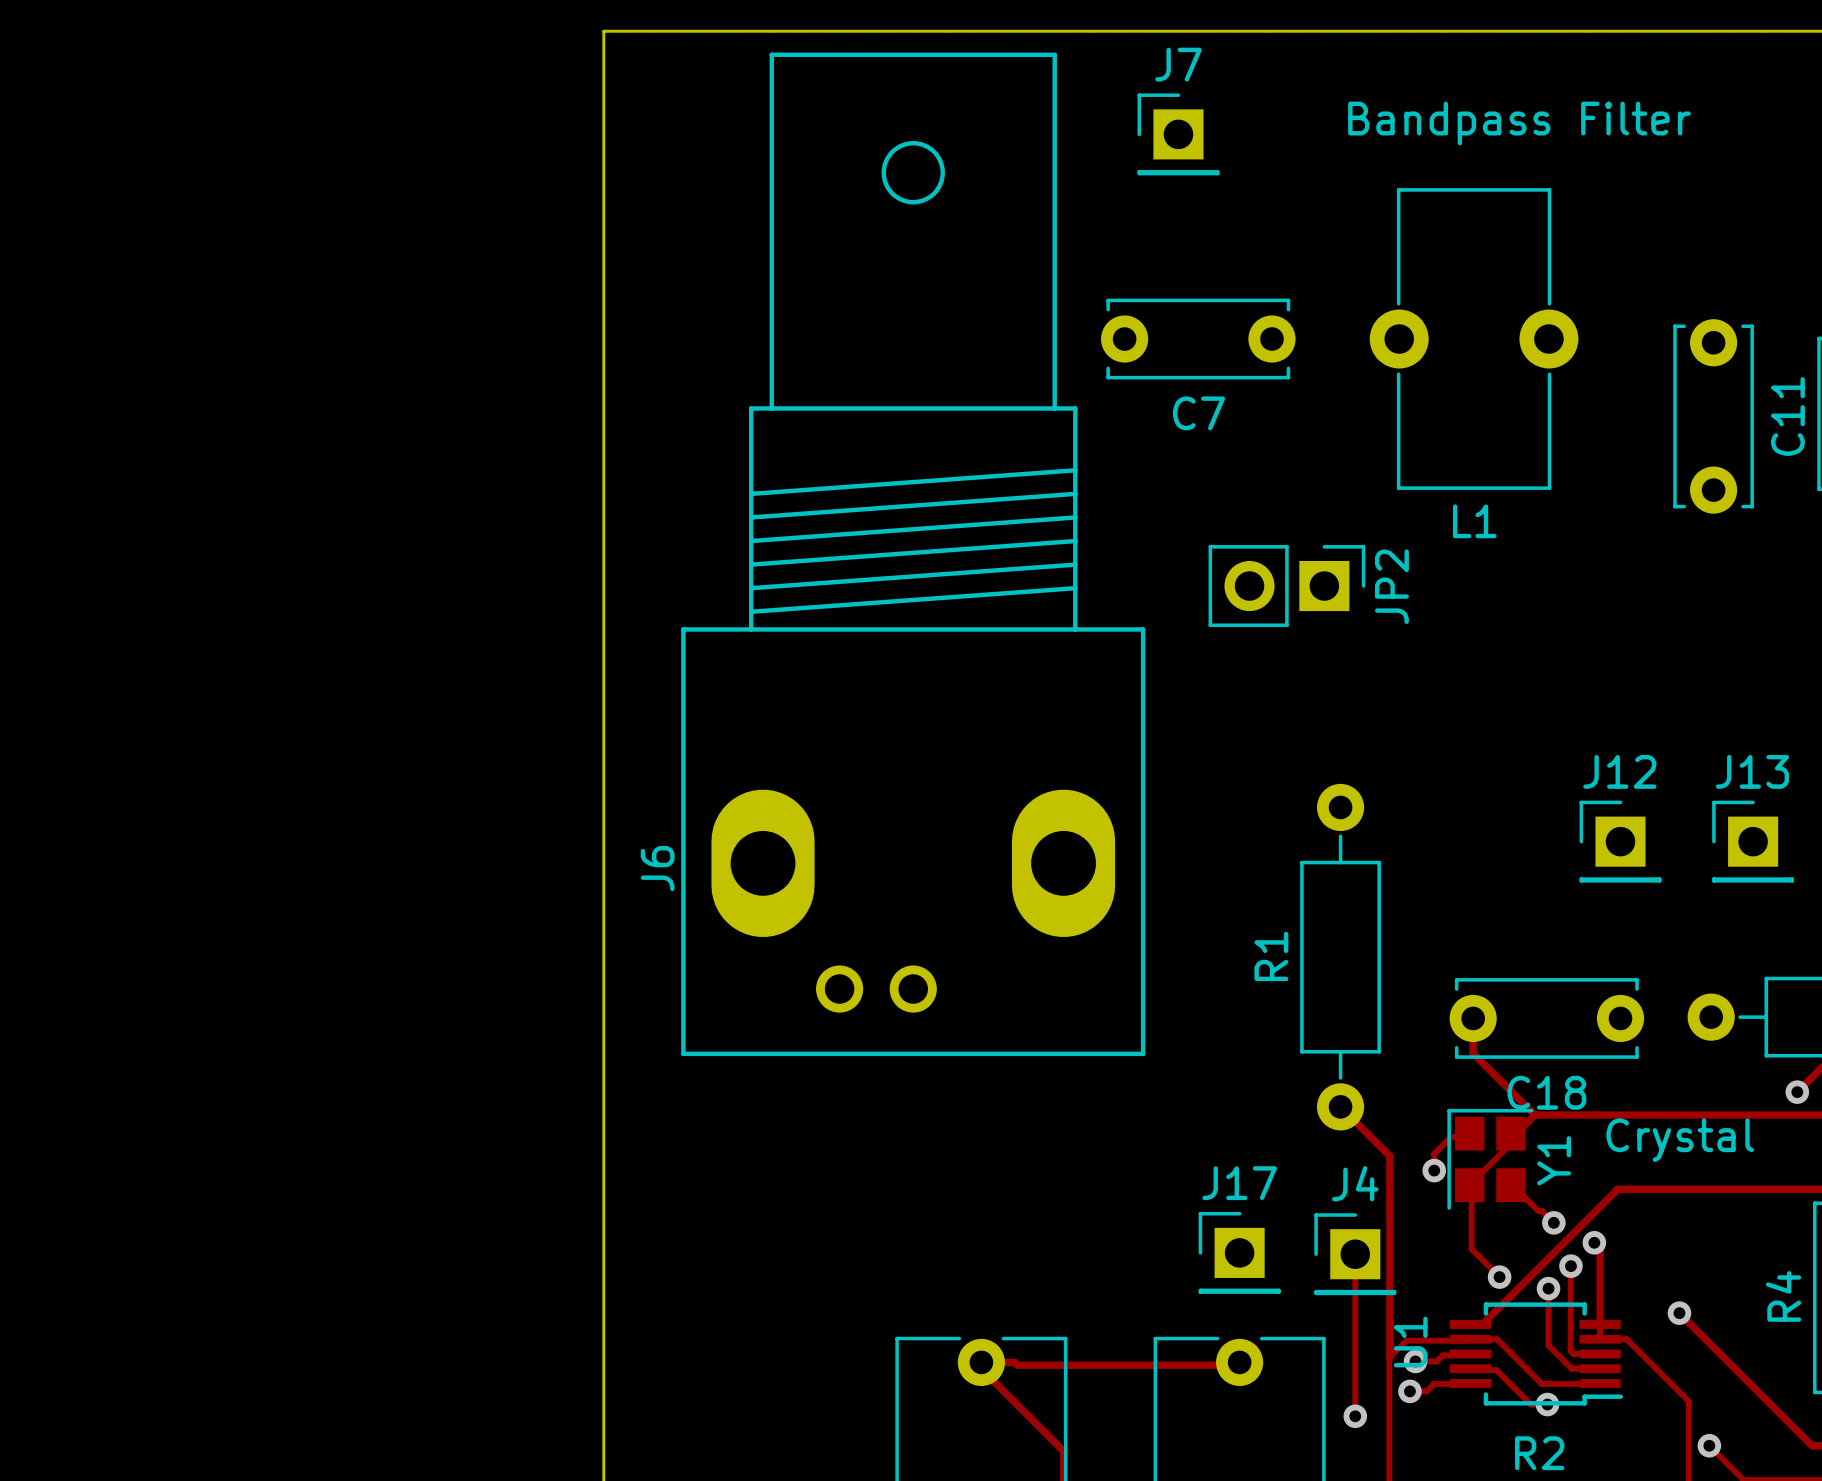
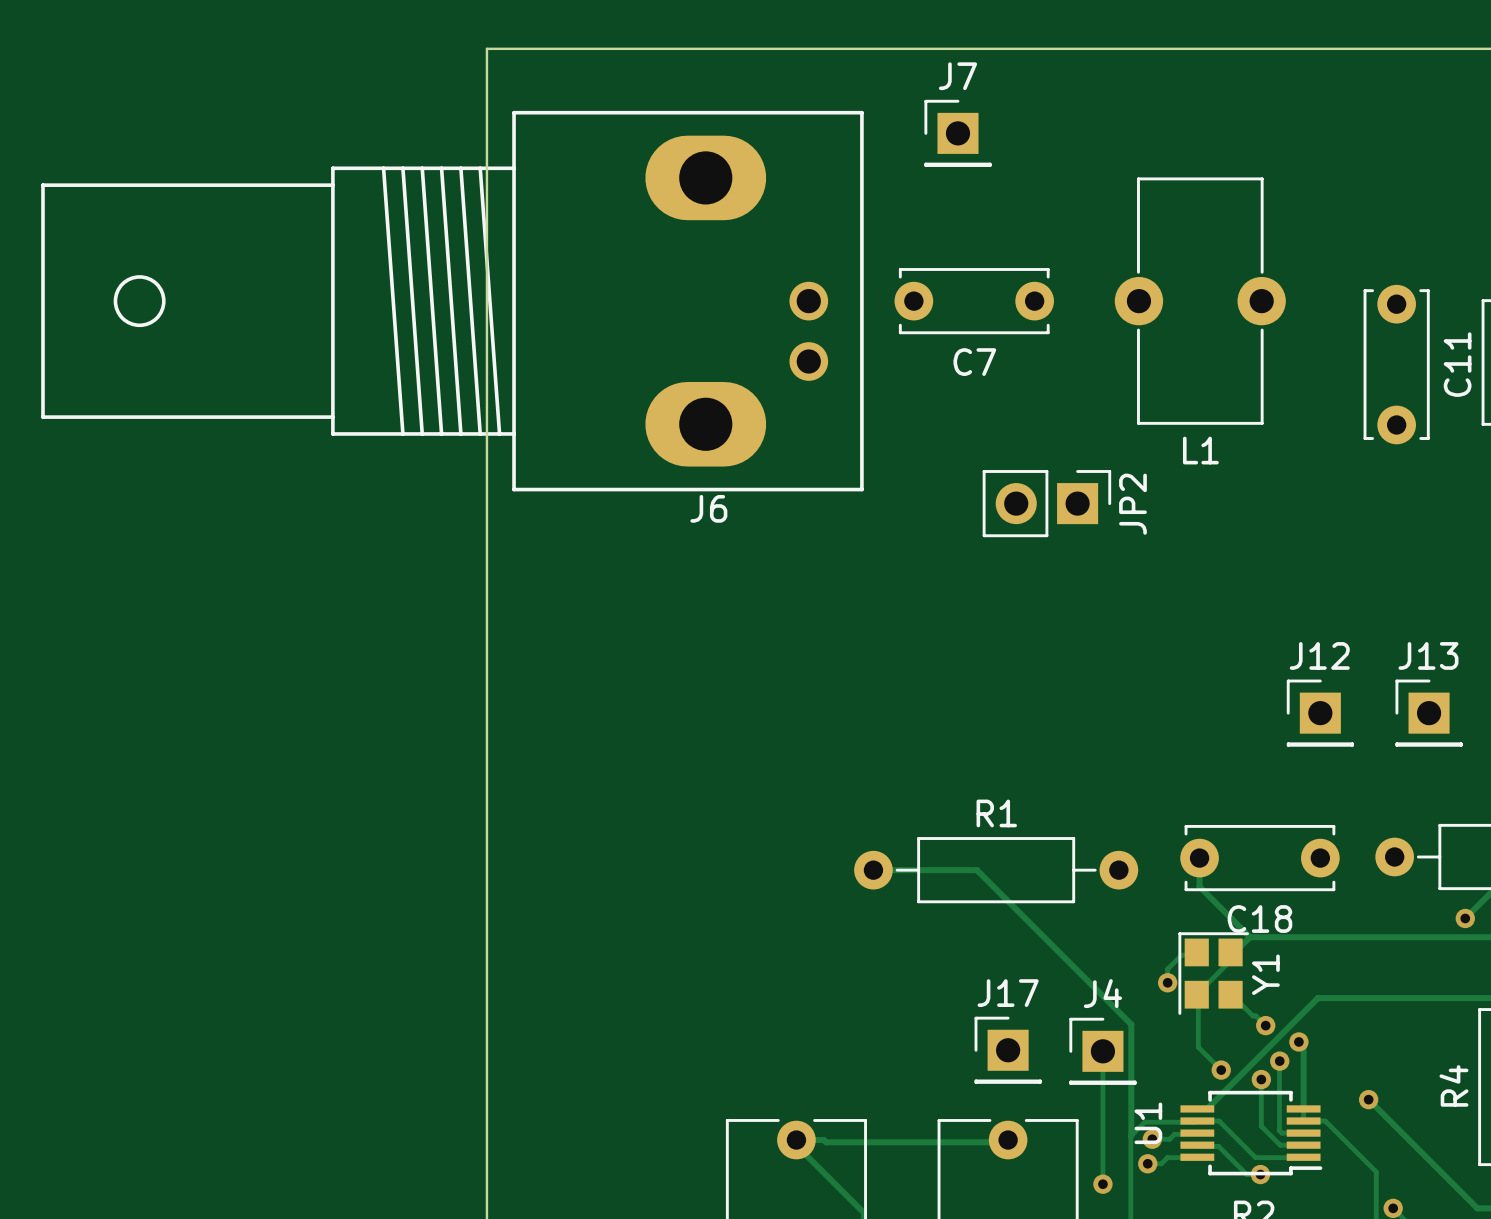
text: Bandpass Filter (1519, 123) -> none
J6 rotation: 0° (913, 554) -> 90° counterclockwise (452, 301)
R1 rotation: 0° (1340, 957) -> 90° clockwise (996, 870)
track: (1340, 1106) (1389, 1156) (1389, 1221) -> (873, 870) (976, 870) (1131, 1024)
text: Crystal (1680, 1140) -> none

